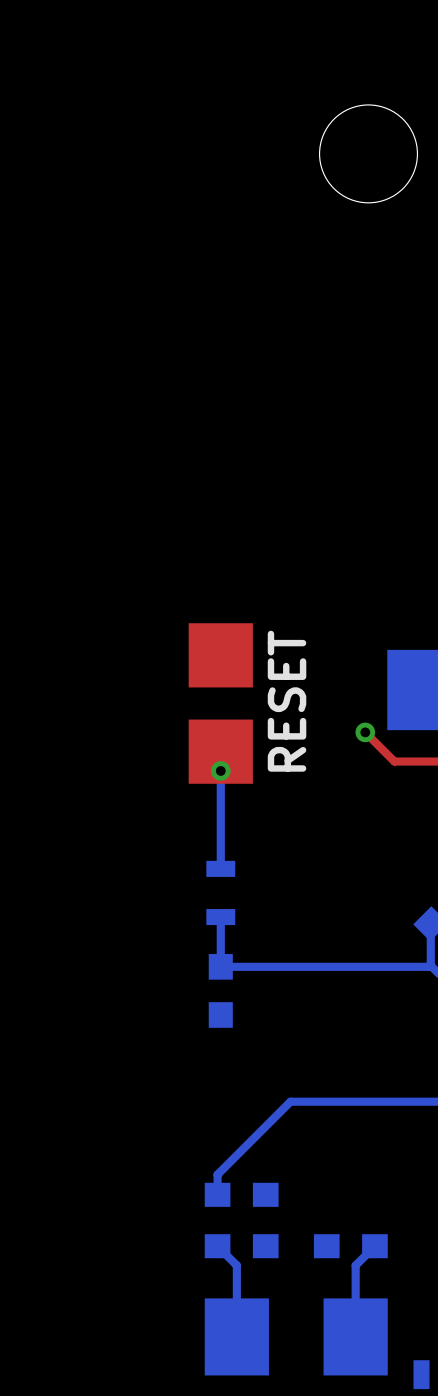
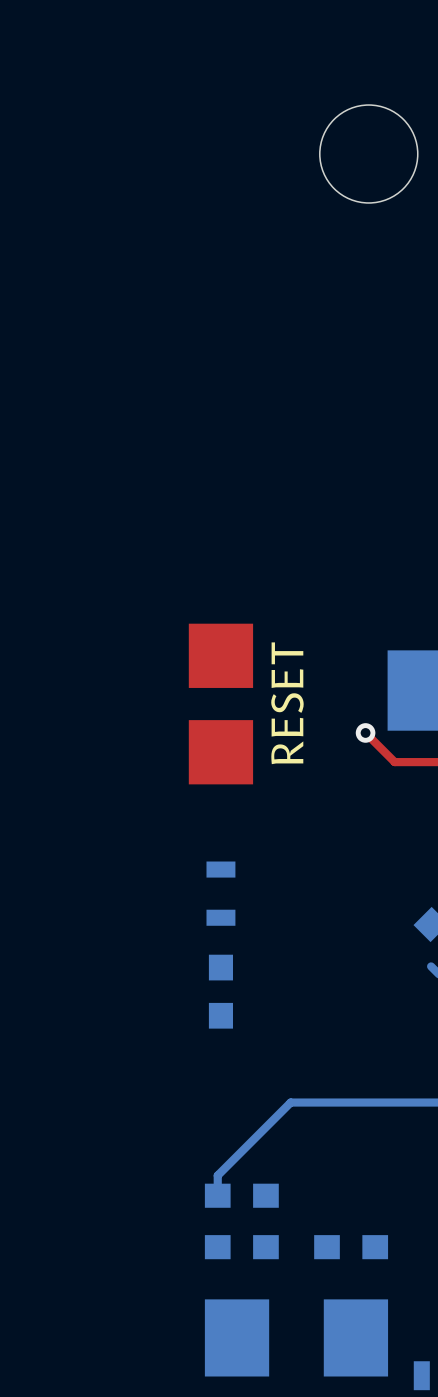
bottom track: (220, 770) (220, 868) -> none
via: (220, 770) -> none
bottom track: (220, 917) (220, 966) (429, 966) (430, 923) -> none
bottom track: (217, 1246) (236, 1265) (236, 1336) -> none
bottom track: (374, 1246) (355, 1265) (355, 1336) -> none

